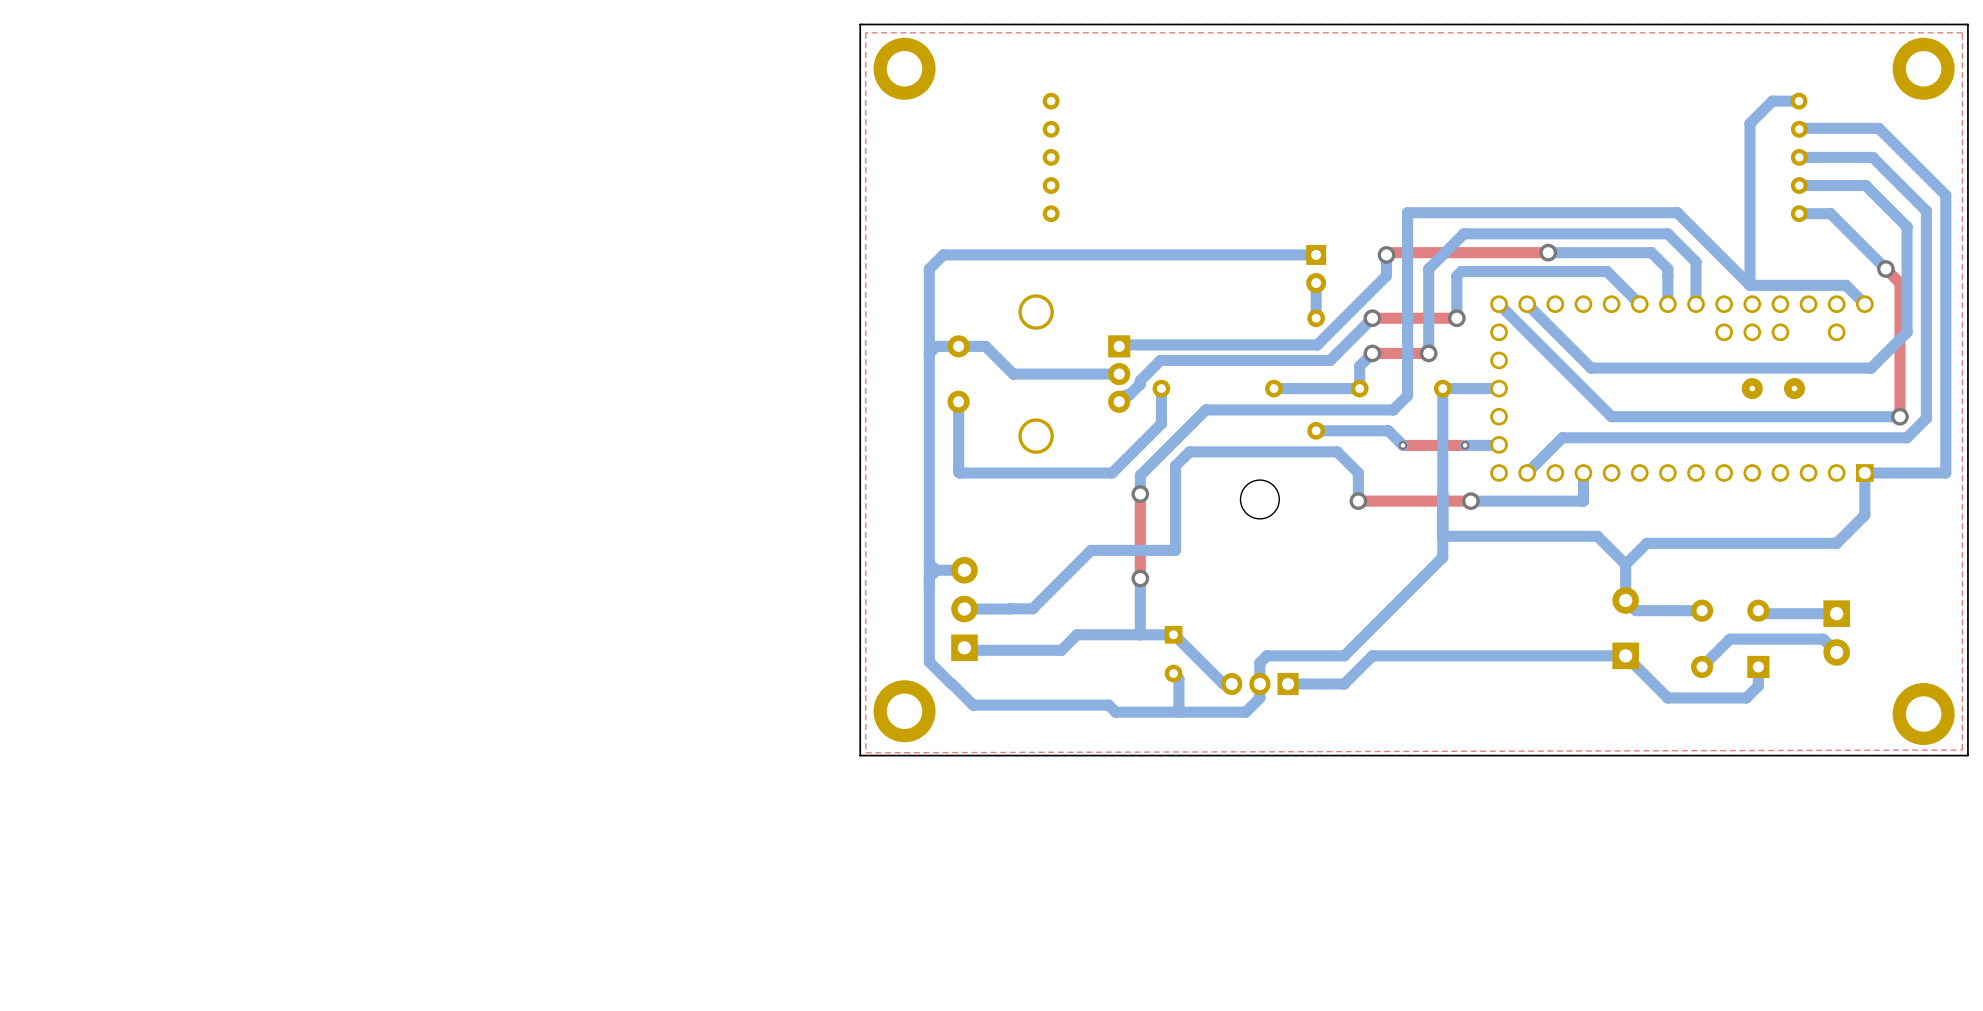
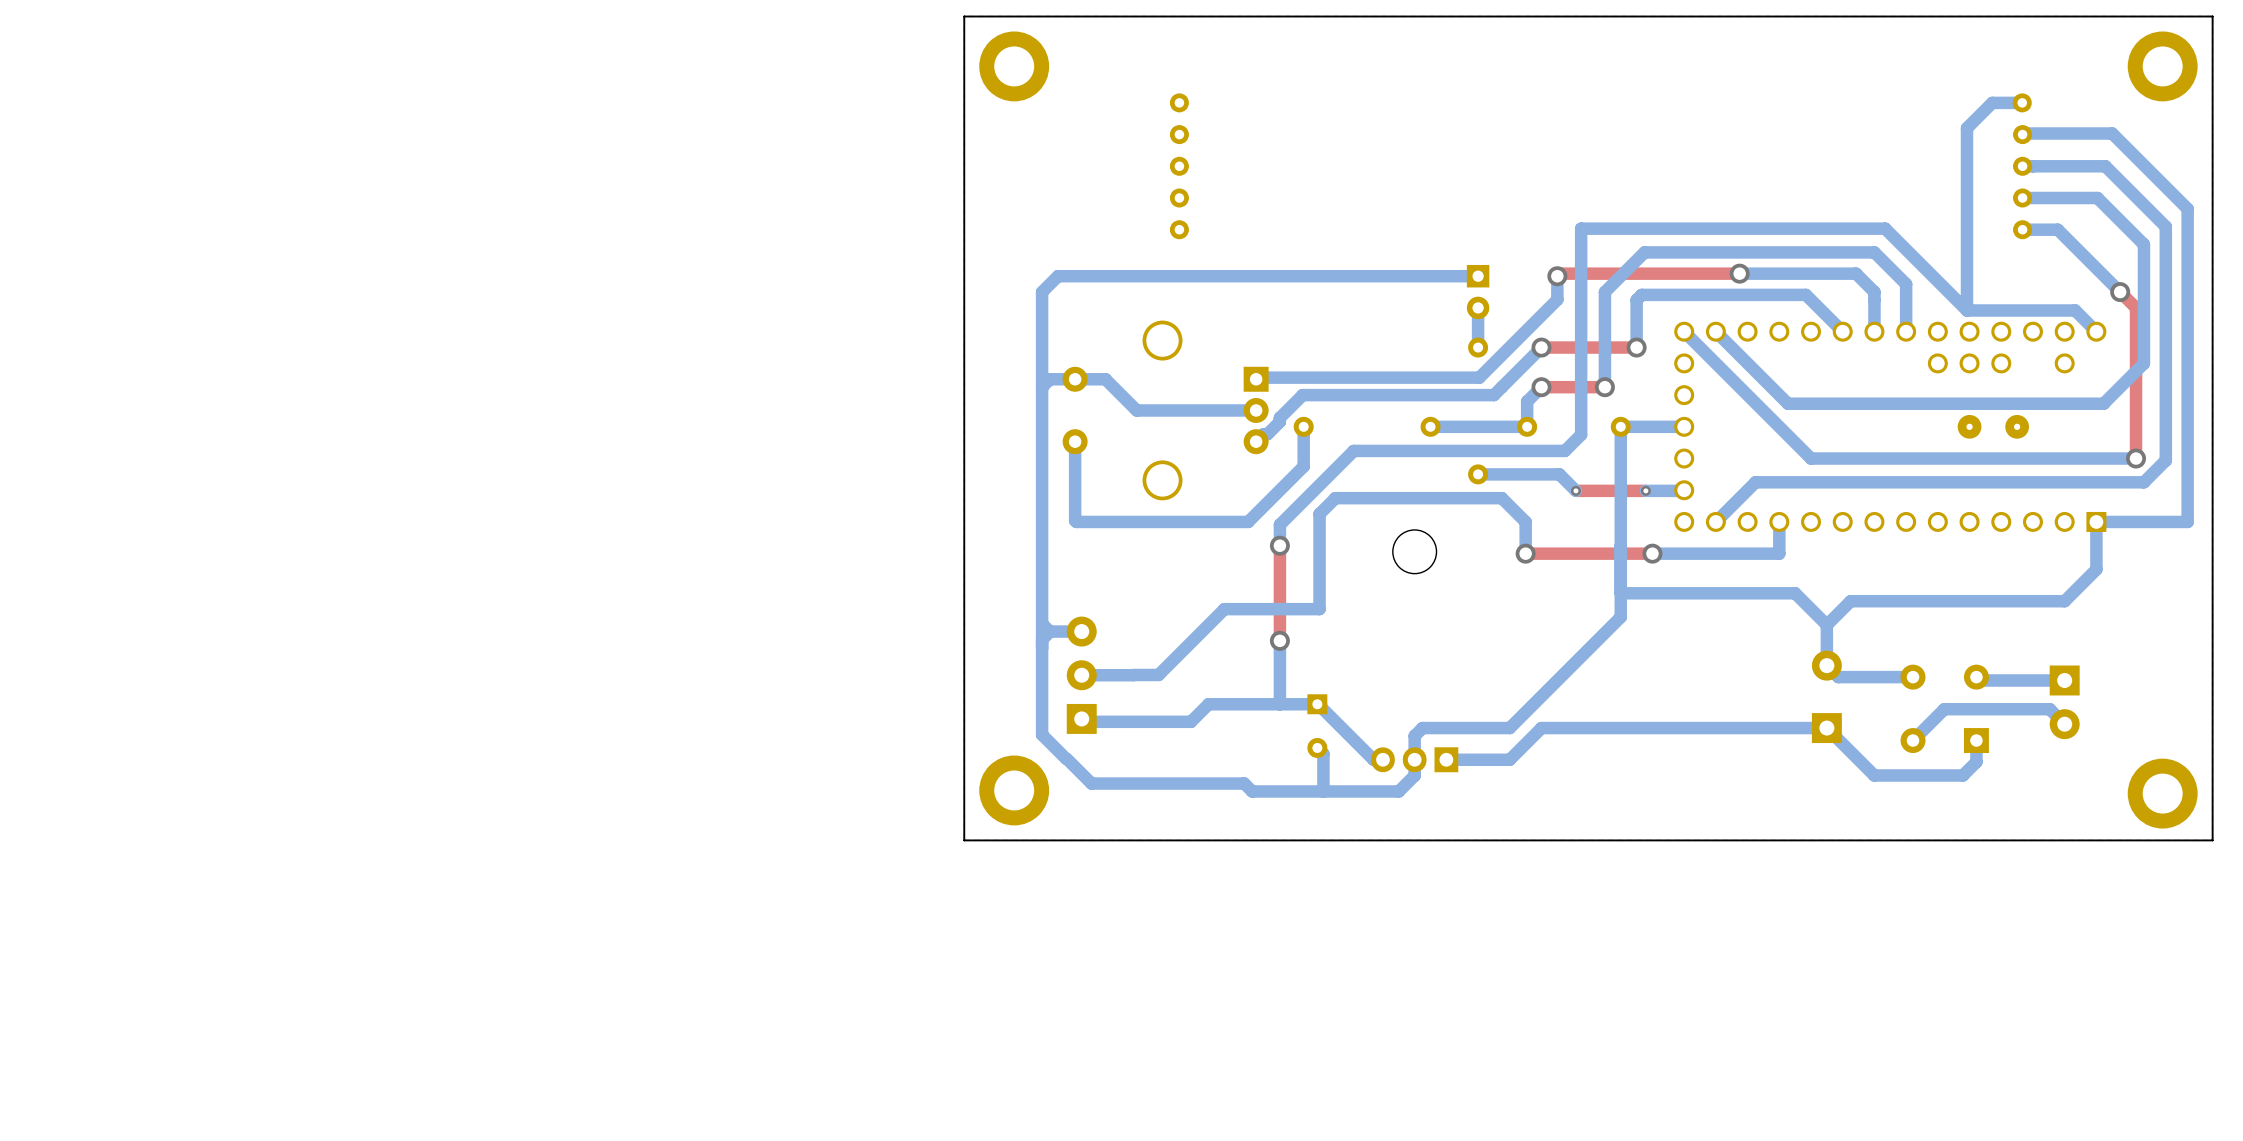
top zone outline: (1962, 32) (1962, 750) (865, 752) (865, 32) (1962, 32) -> none

